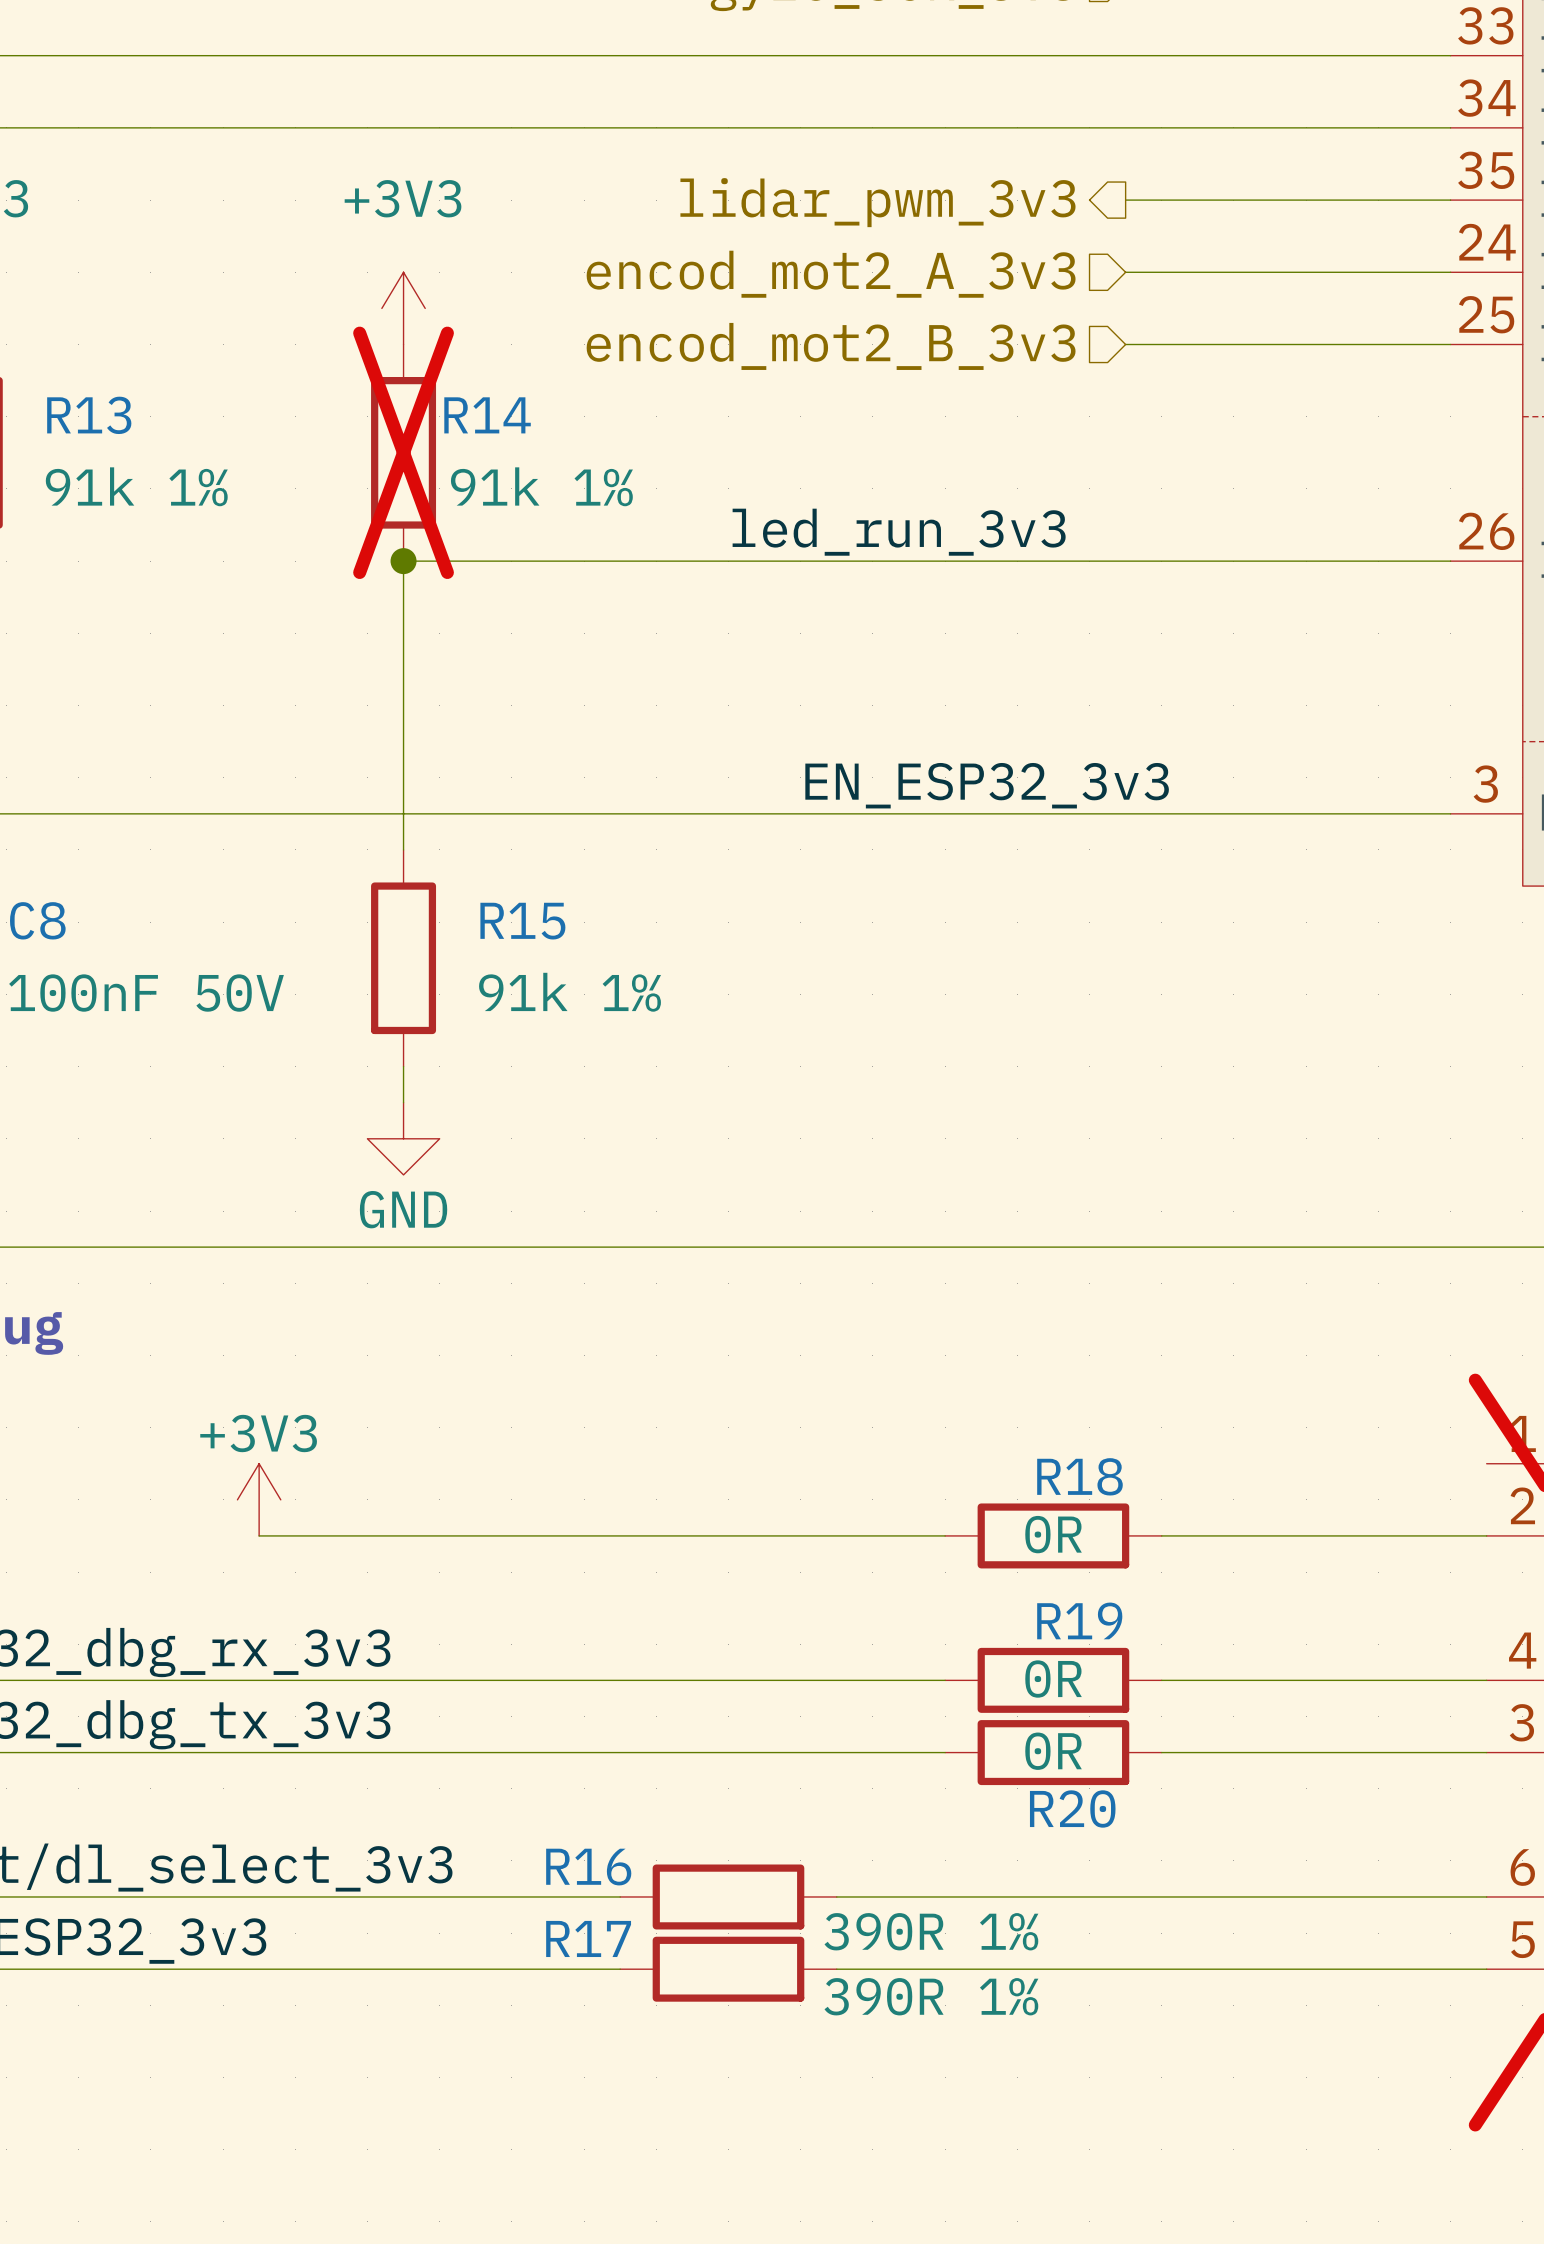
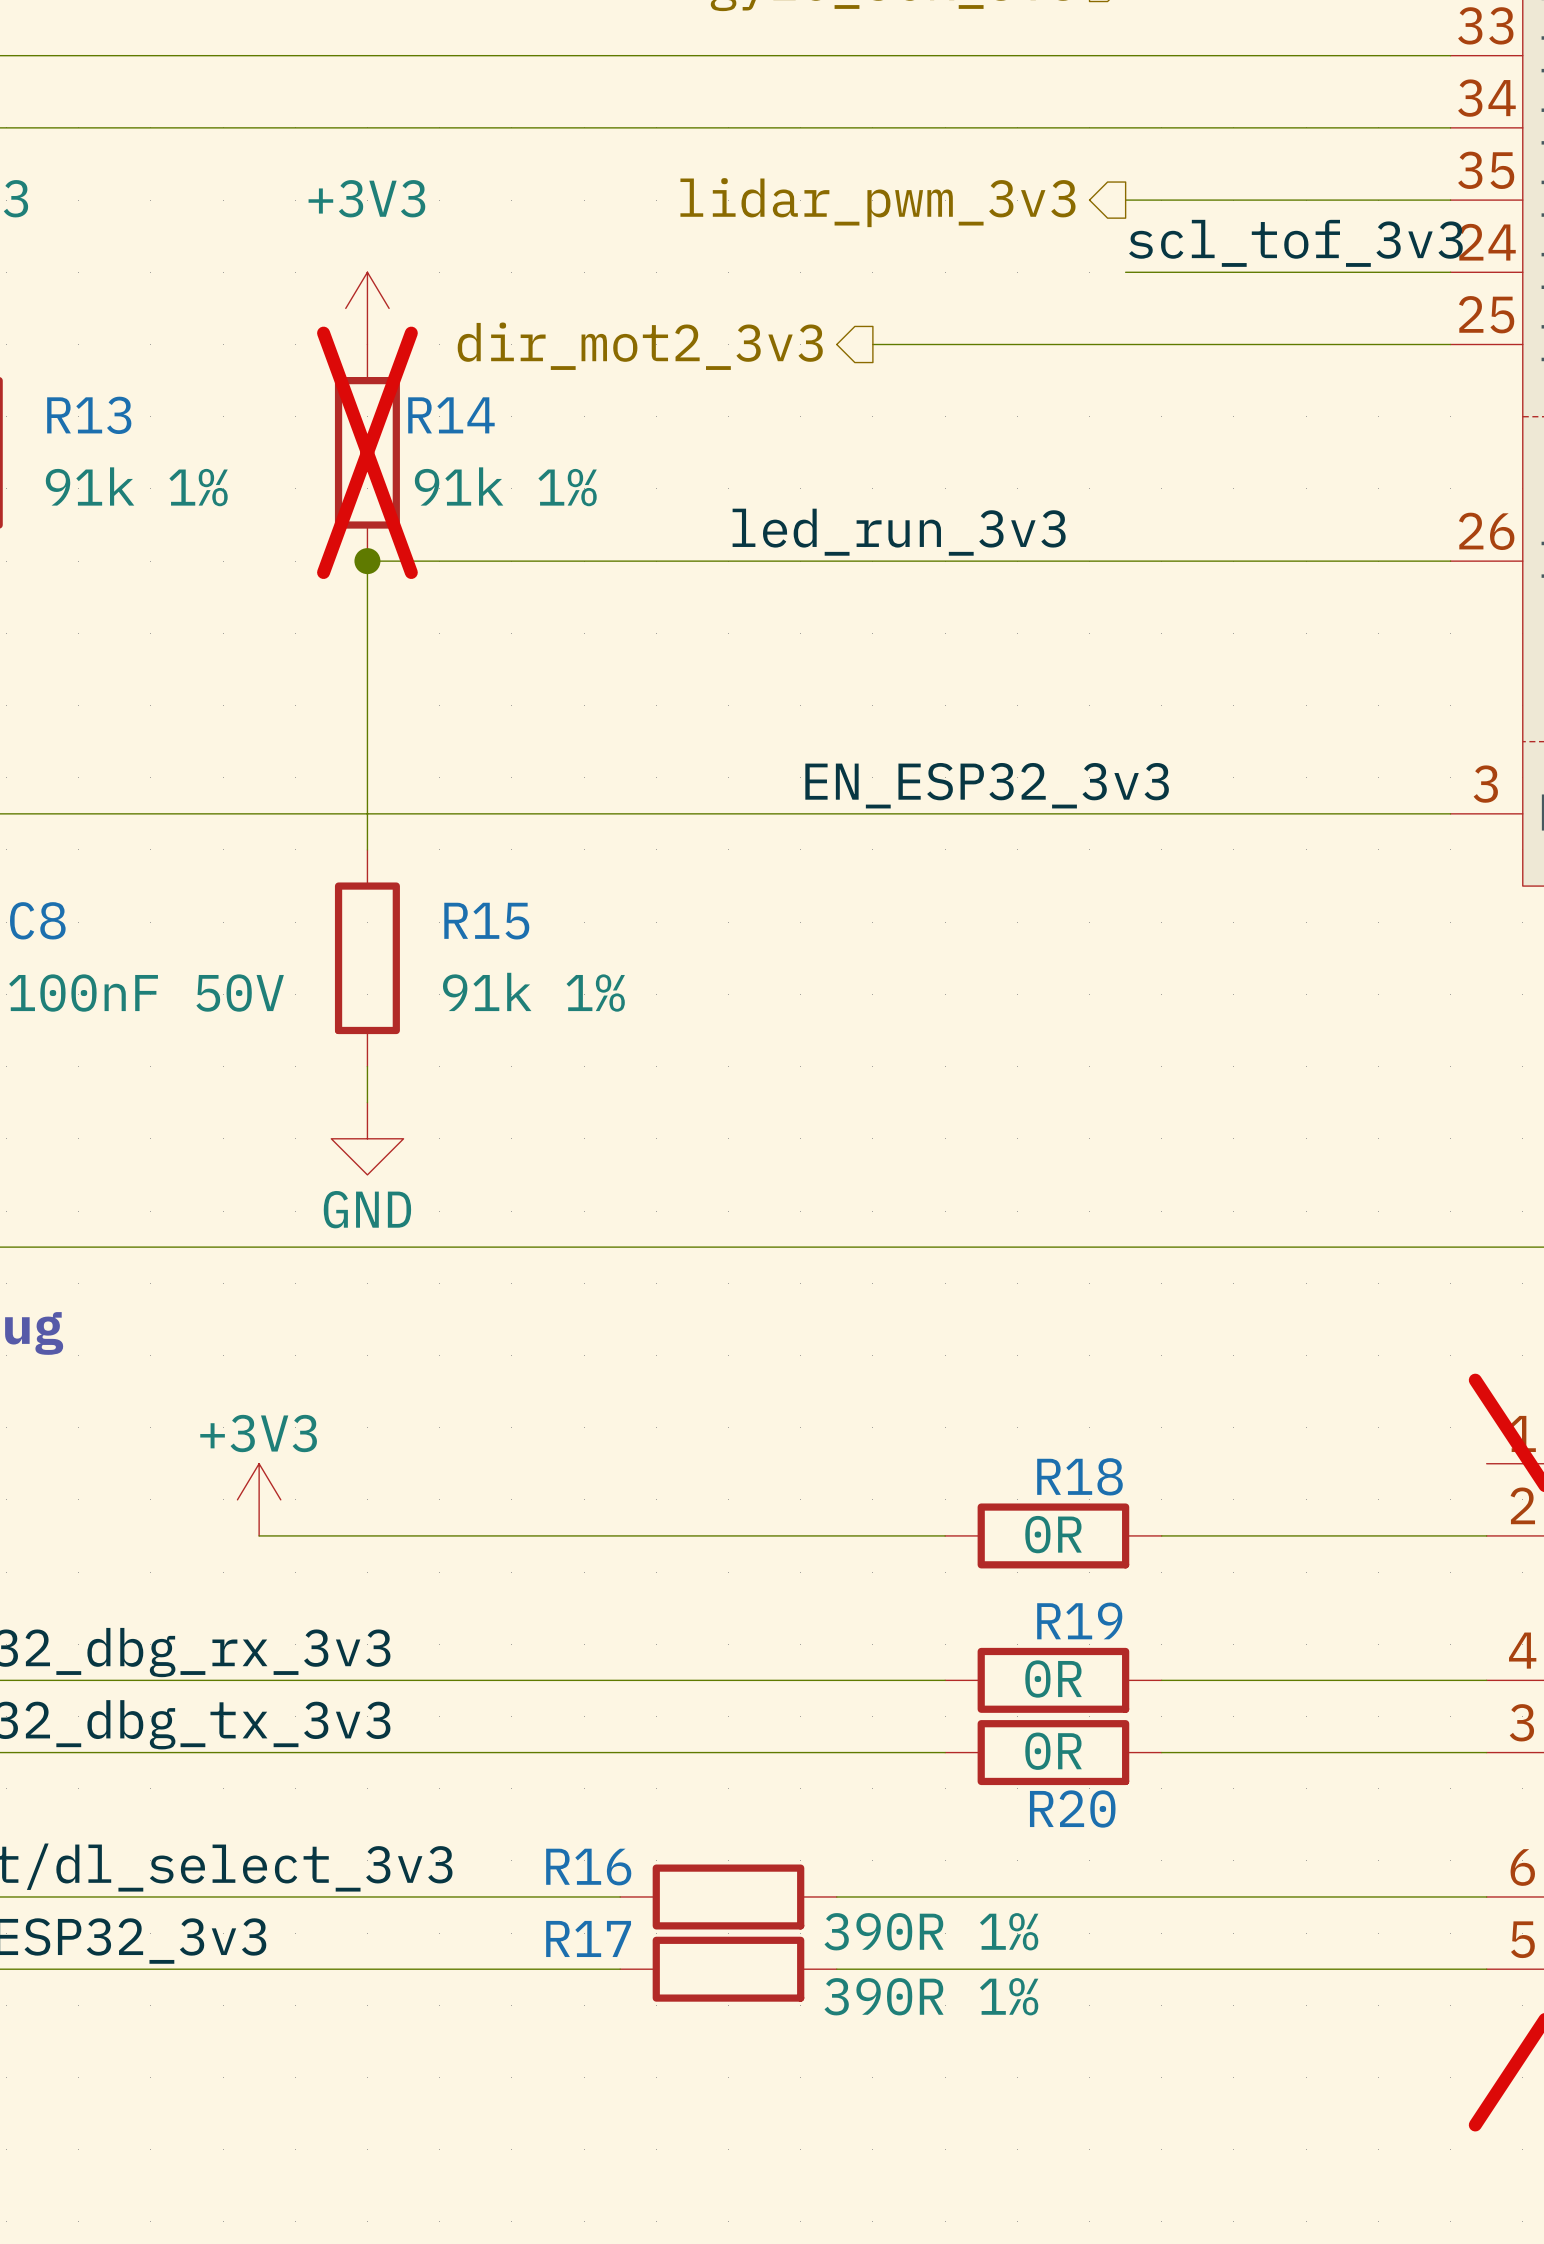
label: none -> scl_tof_3v3 (1295, 243)
hierarchical label: encod_mot2_A_3v3 (831, 274) -> none
power symbol position: +3V3 (403, 308) -> +3V3 (367, 308)
wire: none -> (872, 344) (1125, 344)
hierarchical label: none -> dir_mot2_3v3 (640, 346)
hierarchical label: encod_mot2_B_3v3 (831, 346) -> none
R14 position: (403, 452) -> (367, 452)
wire: (403, 561) (403, 849) -> (403, 561) (367, 561) (367, 849)
junction position: (403, 561) -> (367, 561)
R15 position: (403, 958) -> (367, 958)
wire: (403, 1066) (403, 1102) -> (367, 1066) (367, 1102)
power symbol position: GND (403, 1138) -> GND (367, 1138)

